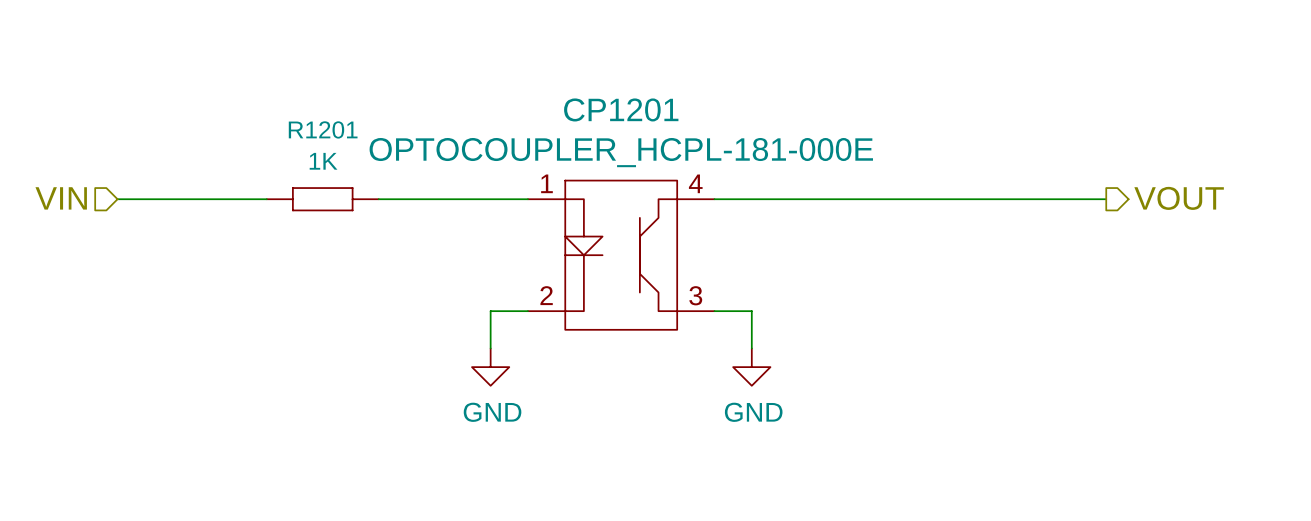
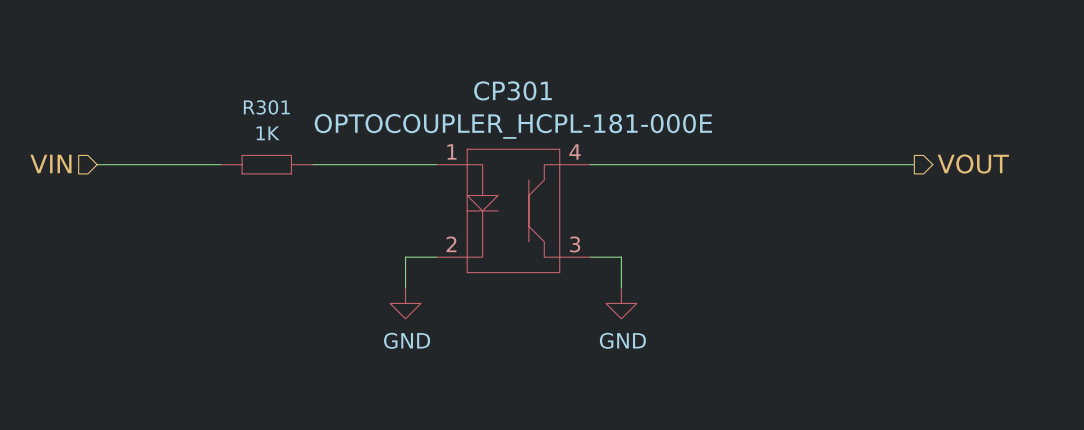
CP1201 name: CP1201 (621, 109) -> CP301 (513, 90)
R1201 name: R1201 (323, 129) -> R301 (266, 107)

